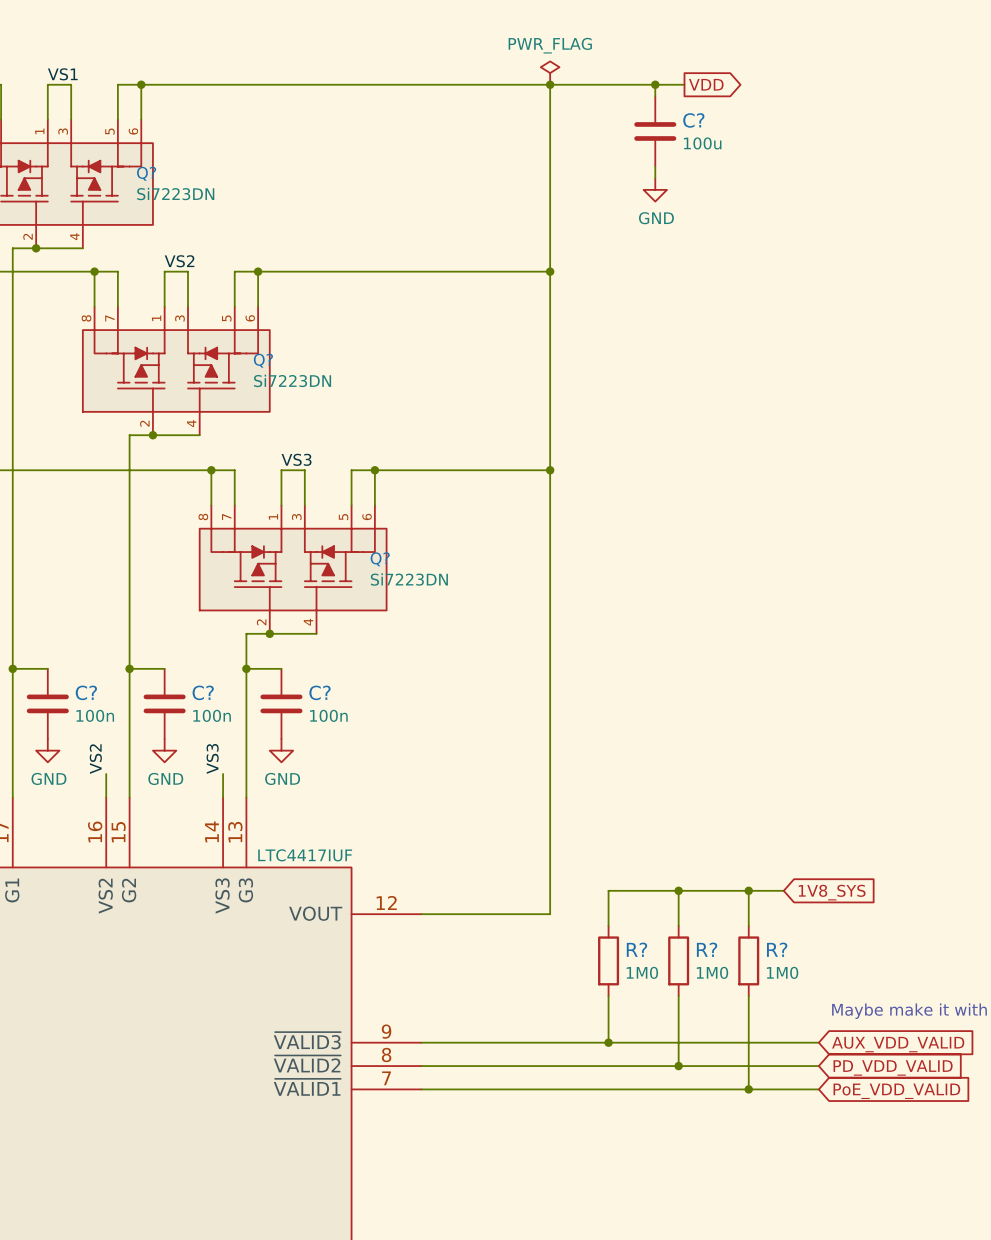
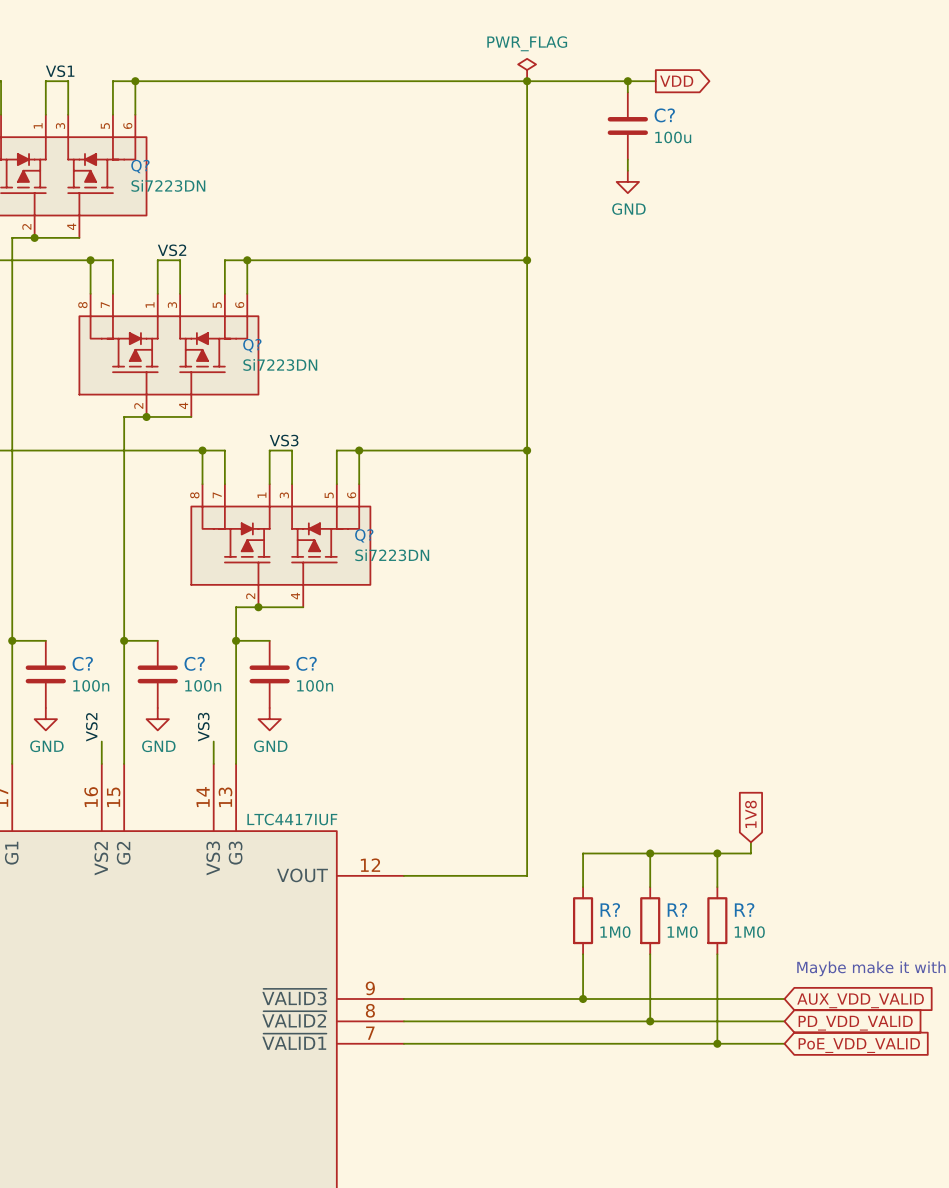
global label: none -> 1V8 (750, 814)
wire: none -> (750, 842) (750, 853)
global label: 1V8_SYS (832, 892) -> none

